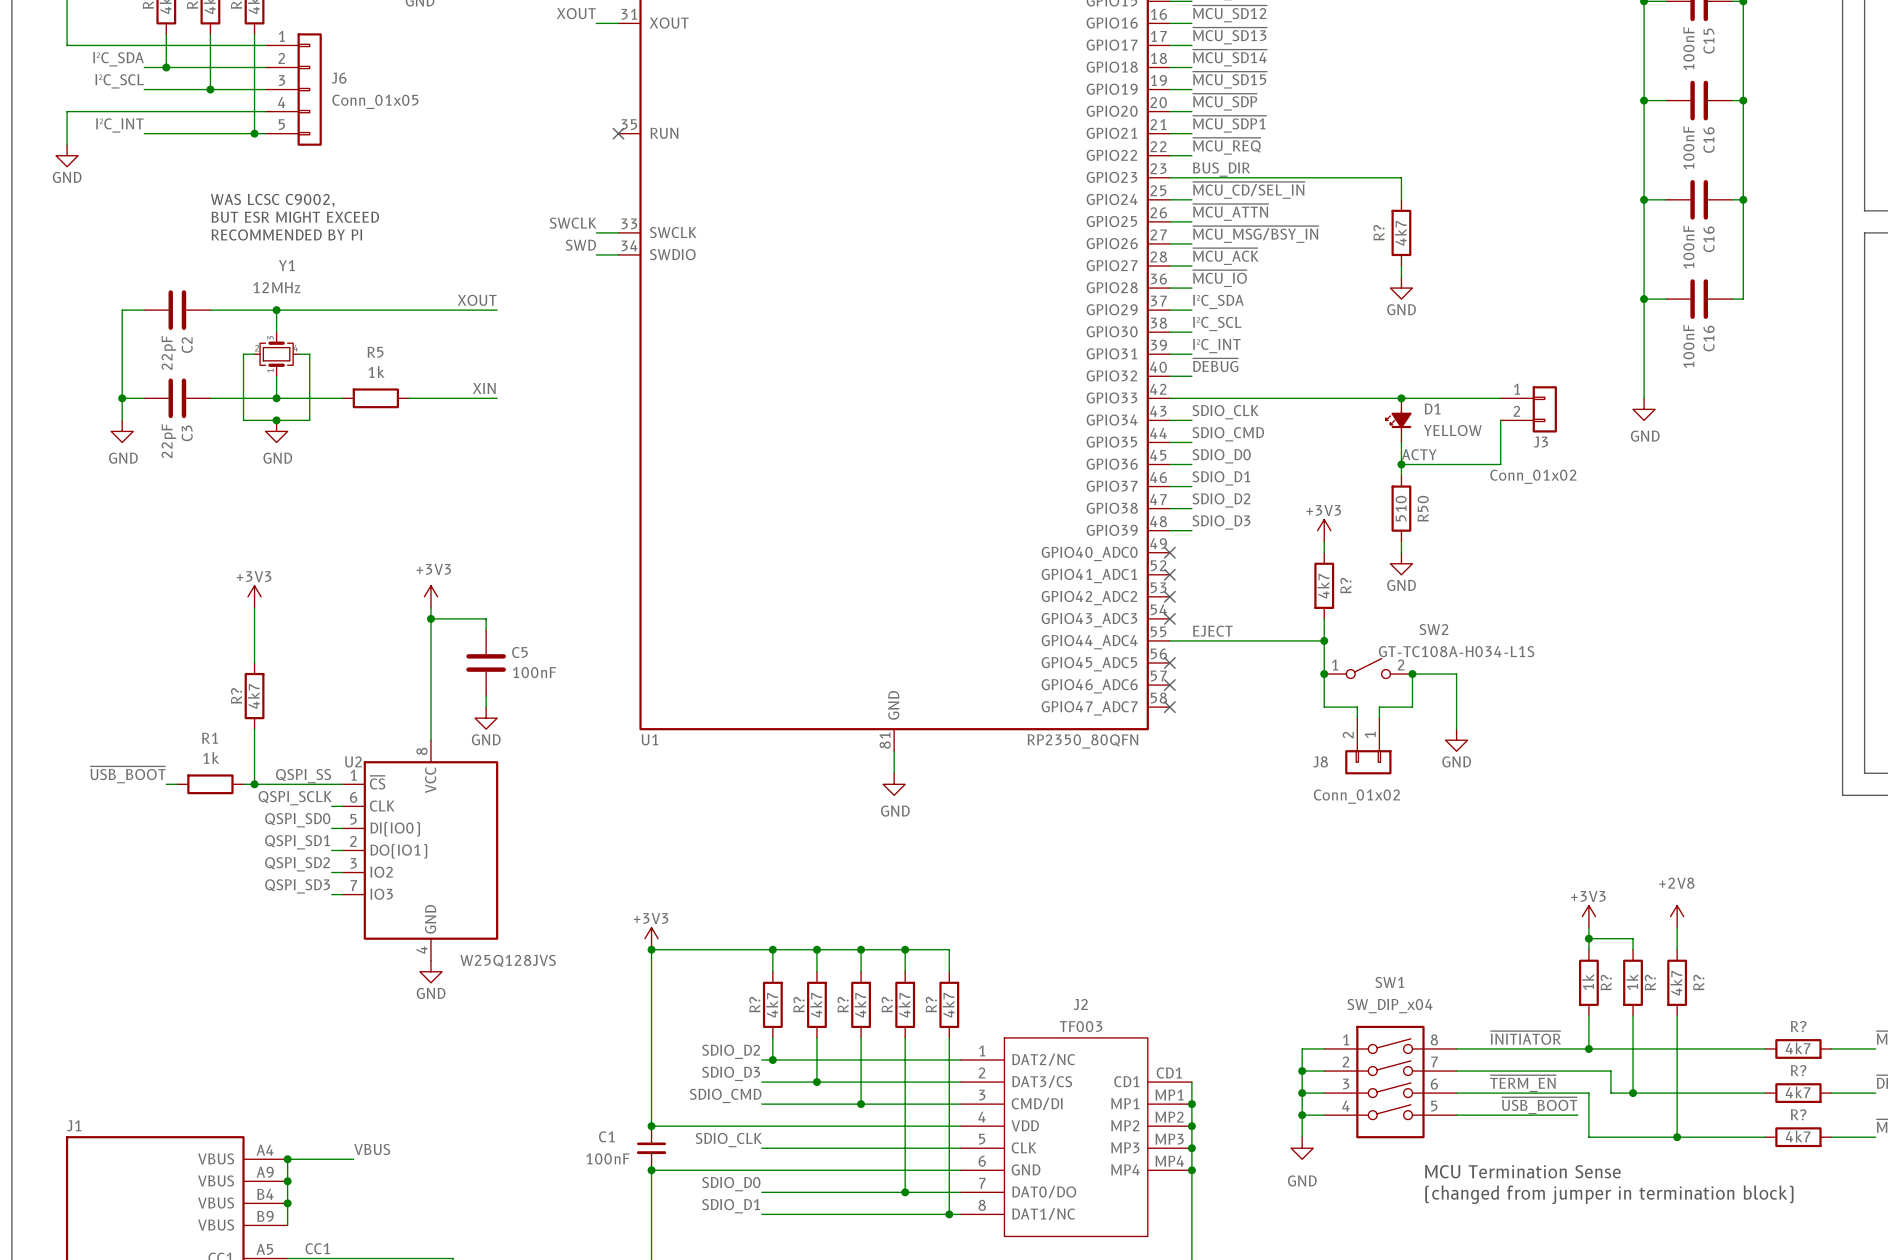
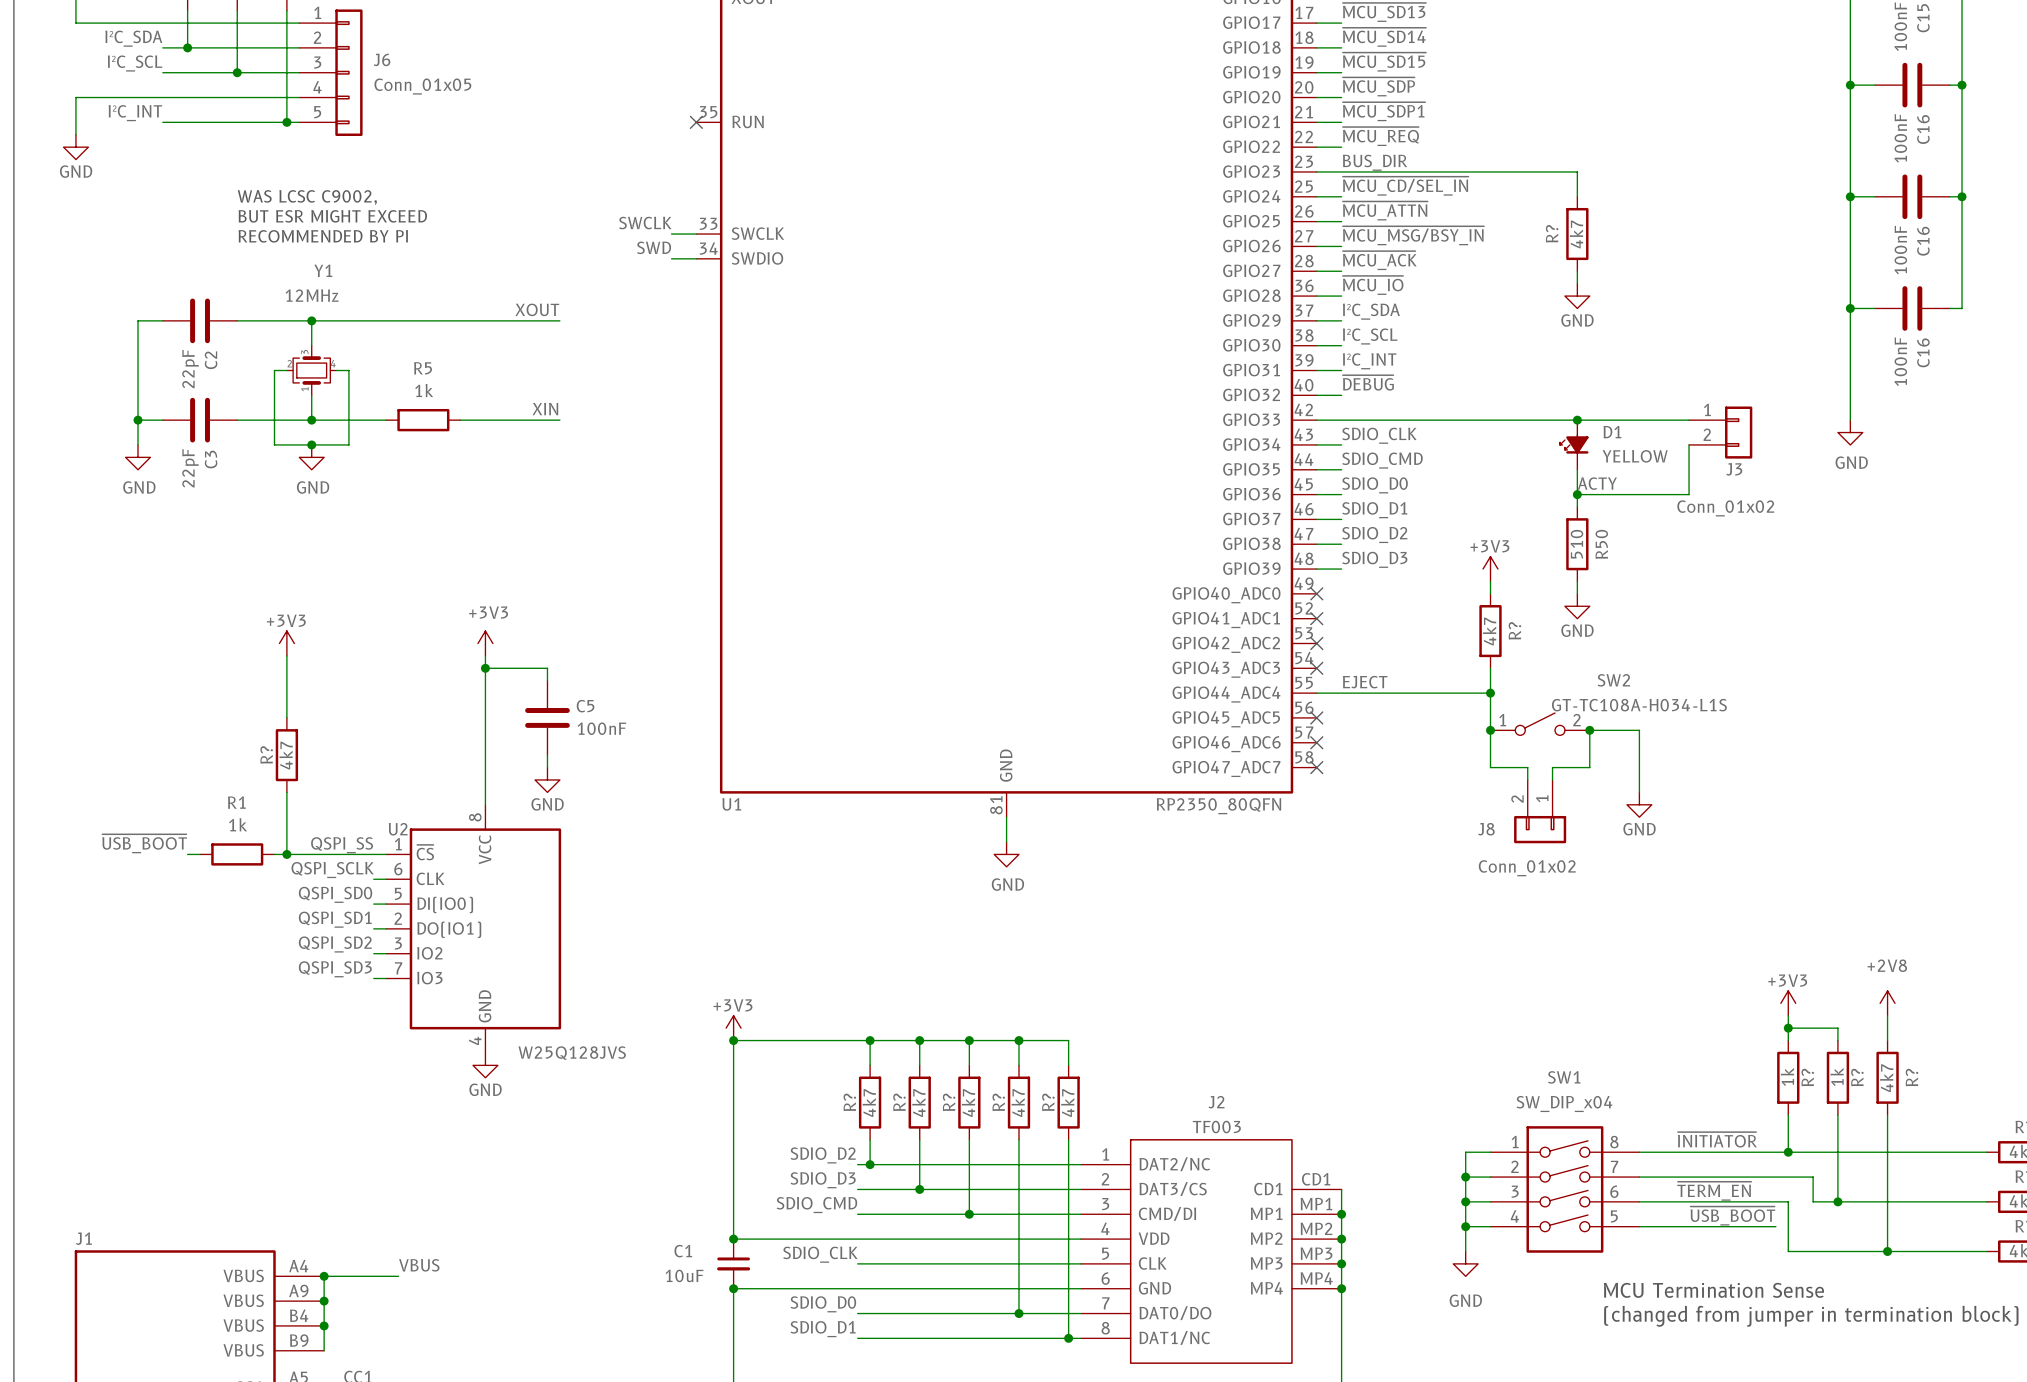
C1 value: 100nF (607, 1158) -> 10uF (684, 1275)

